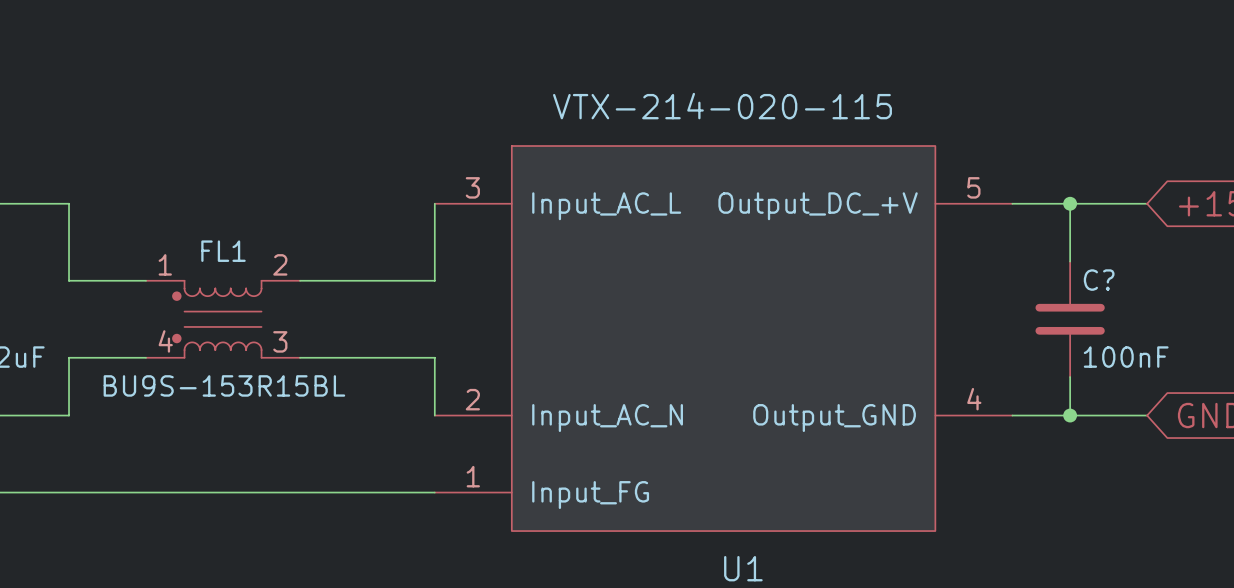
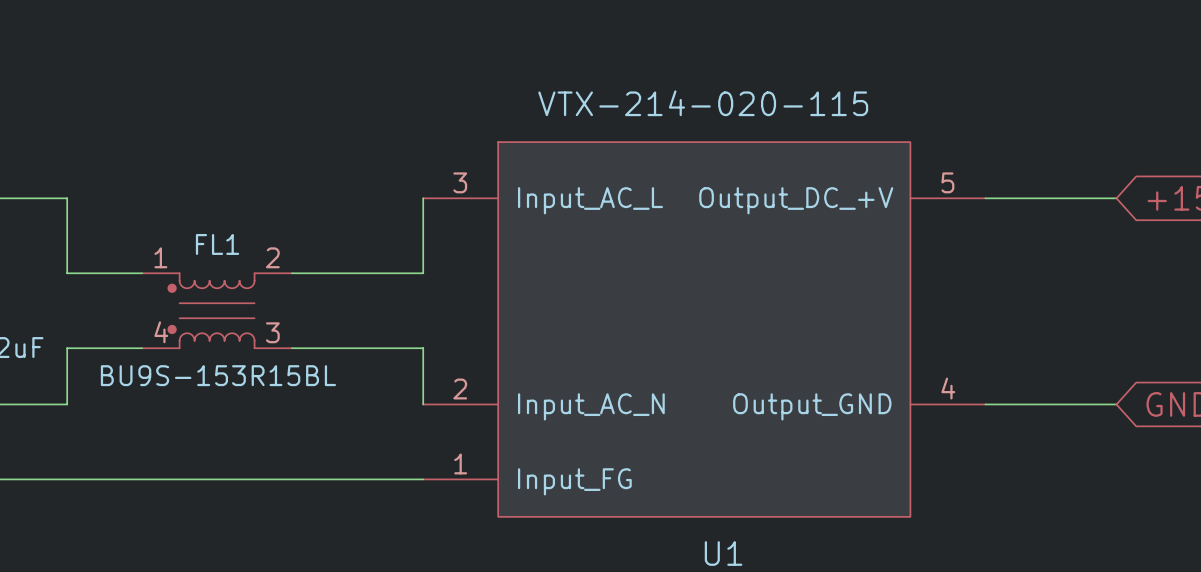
wire: (1070, 203) (1070, 261) -> none
junction: (1070, 203) -> none
C?: 100nF (1070, 319) -> none
wire: (1070, 377) (1070, 415) -> none
junction: (1070, 415) -> none

